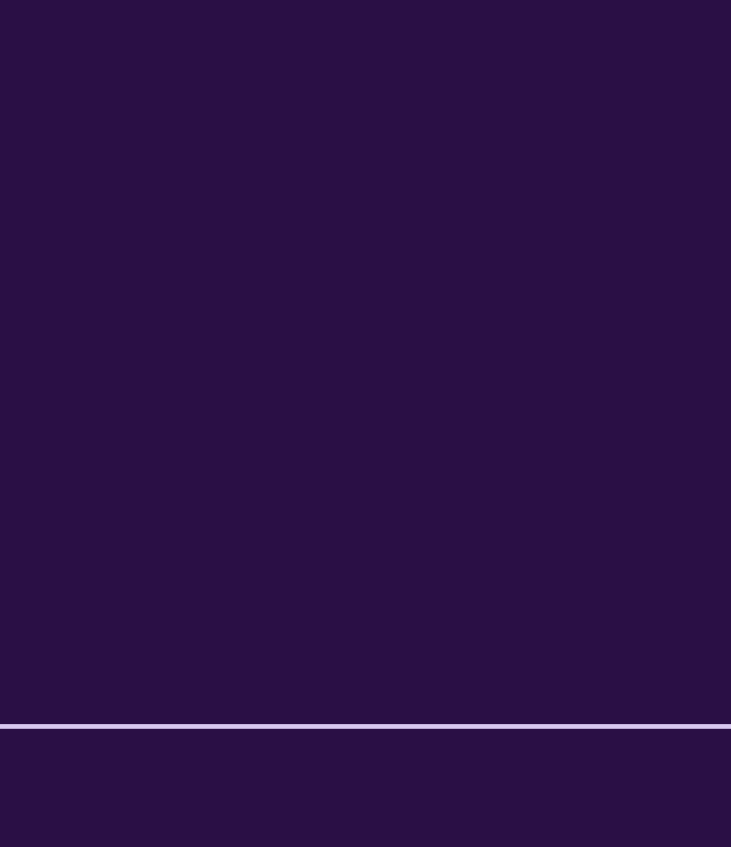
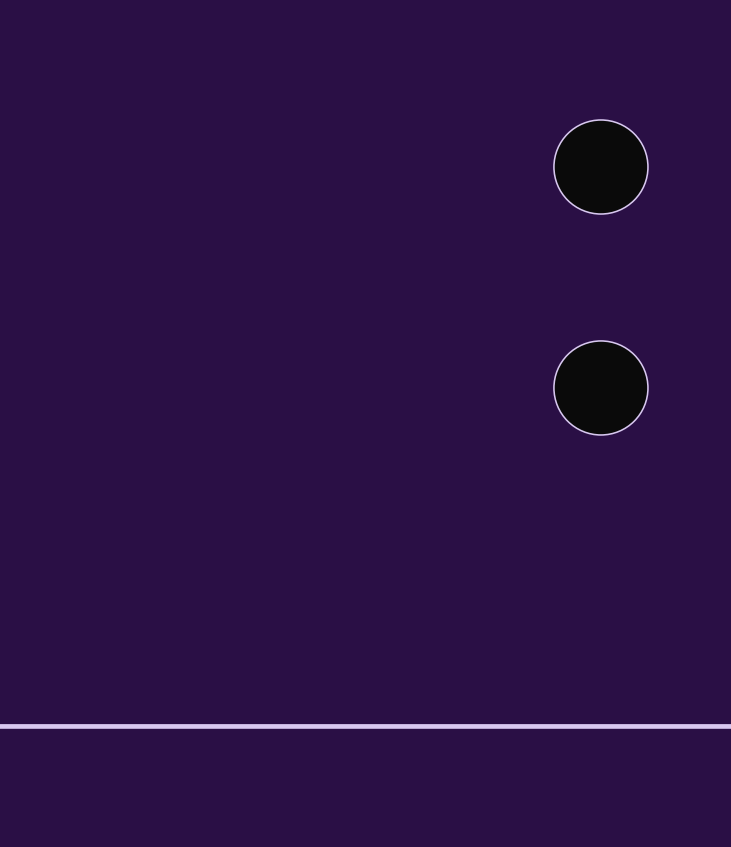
hole: none -> (600, 167)
hole: none -> (600, 387)

